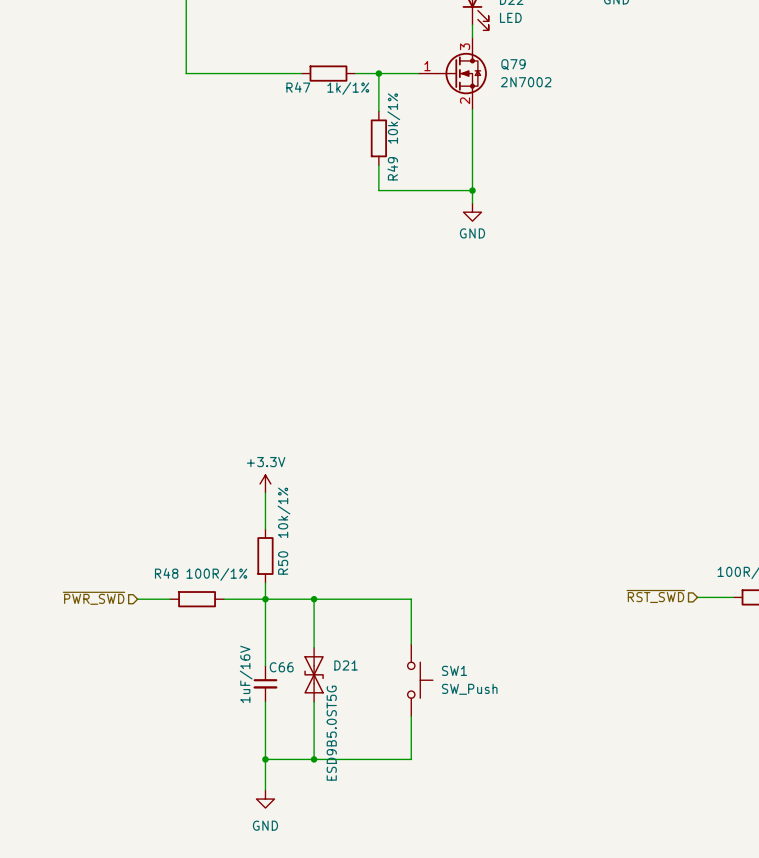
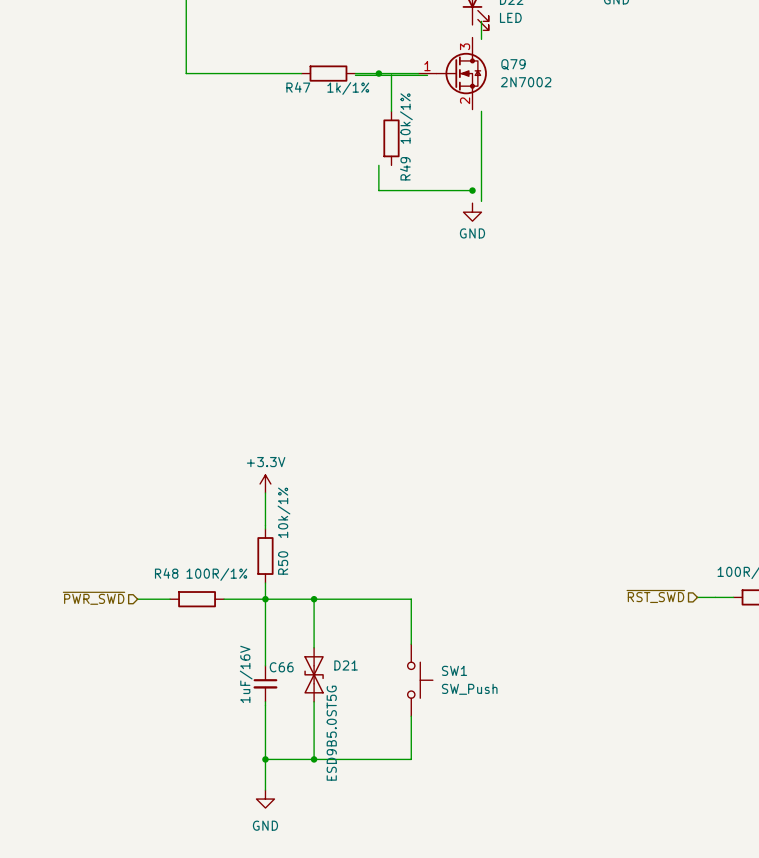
wire: none -> (481, 21) (481, 39)
wire: (472, 24) (472, 37) -> none
wire: (378, 73) (378, 111) -> none
wire: none -> (355, 75) (427, 75)
wire: none -> (391, 75) (391, 111)
wire: (472, 109) (472, 203) -> none
wire: none -> (481, 111) (481, 201)
R49 position: (378, 138) -> (391, 138)

